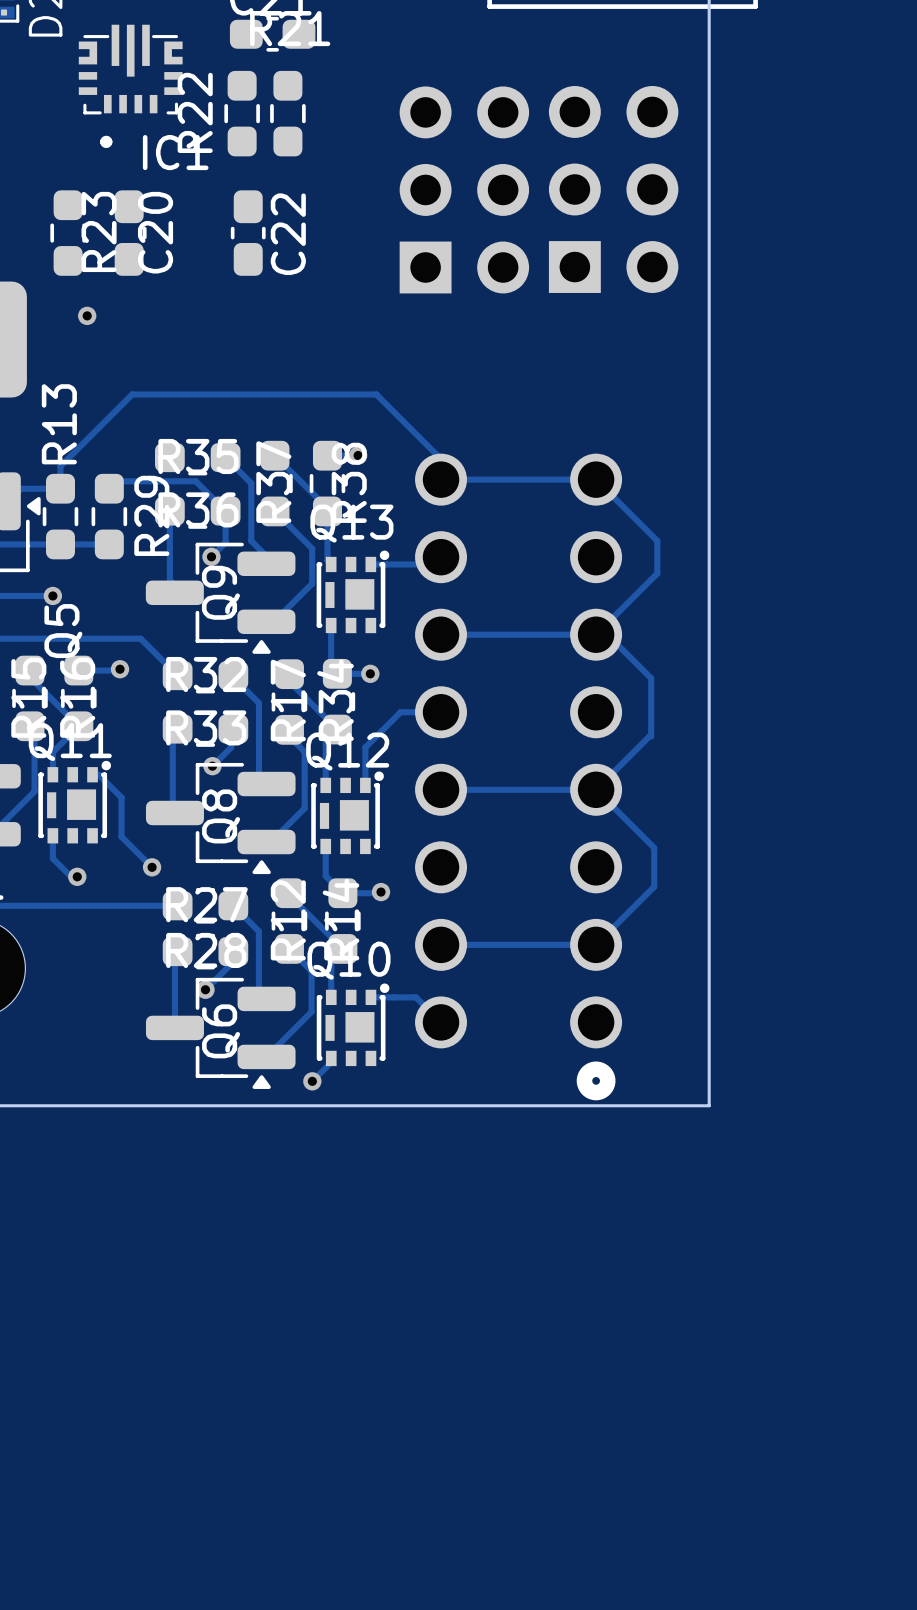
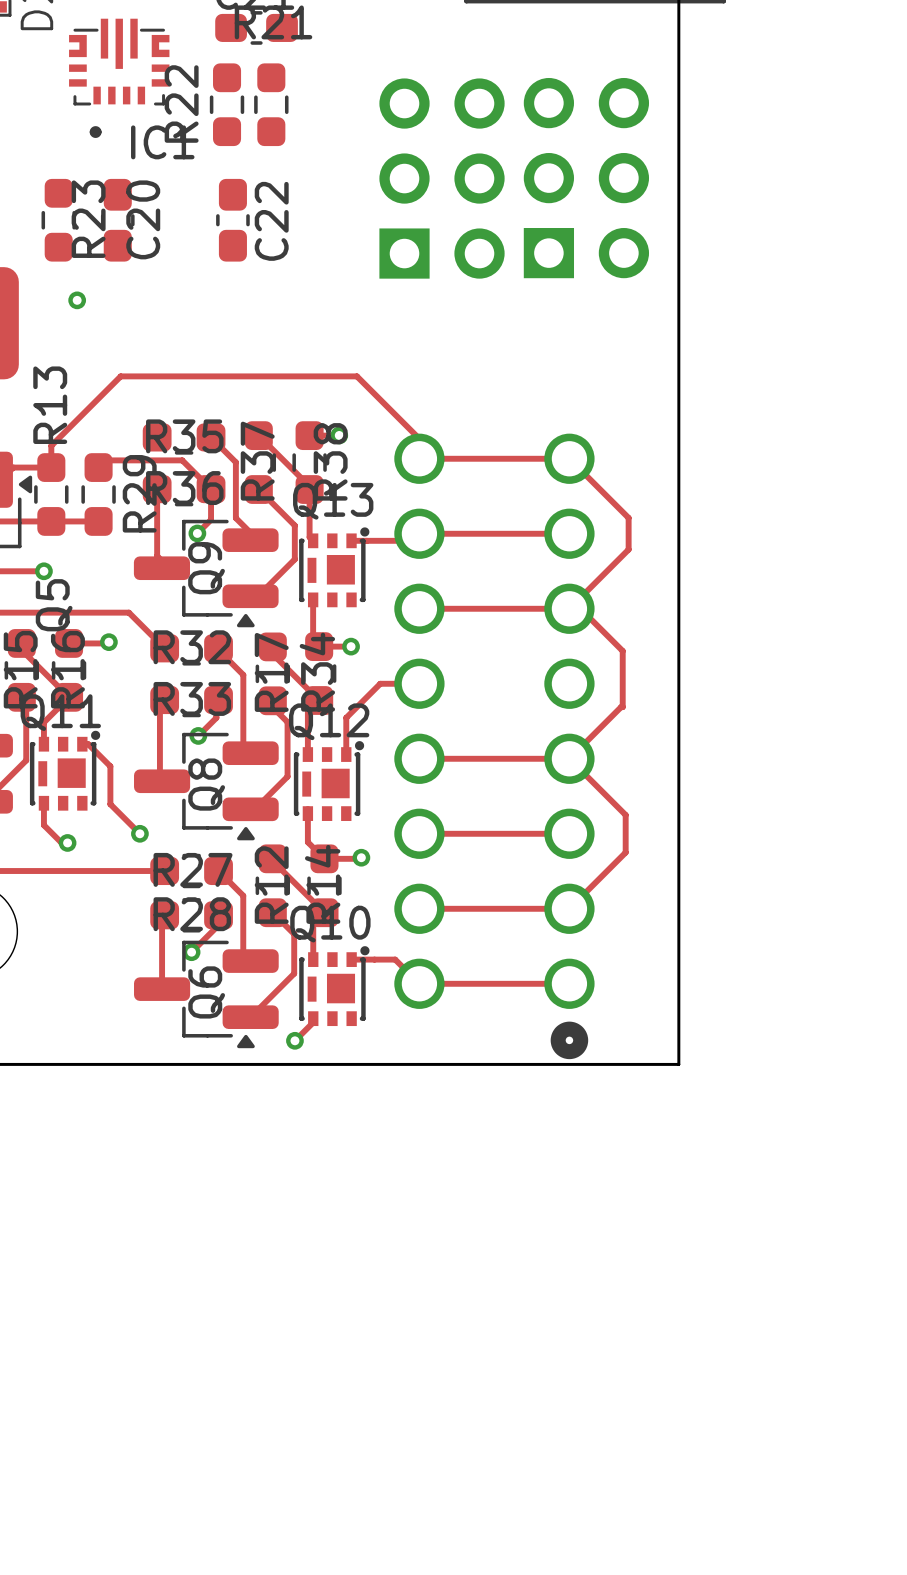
track: none -> (419, 533) (569, 533)
track: none -> (419, 833) (569, 833)
track: none -> (419, 983) (569, 983)

